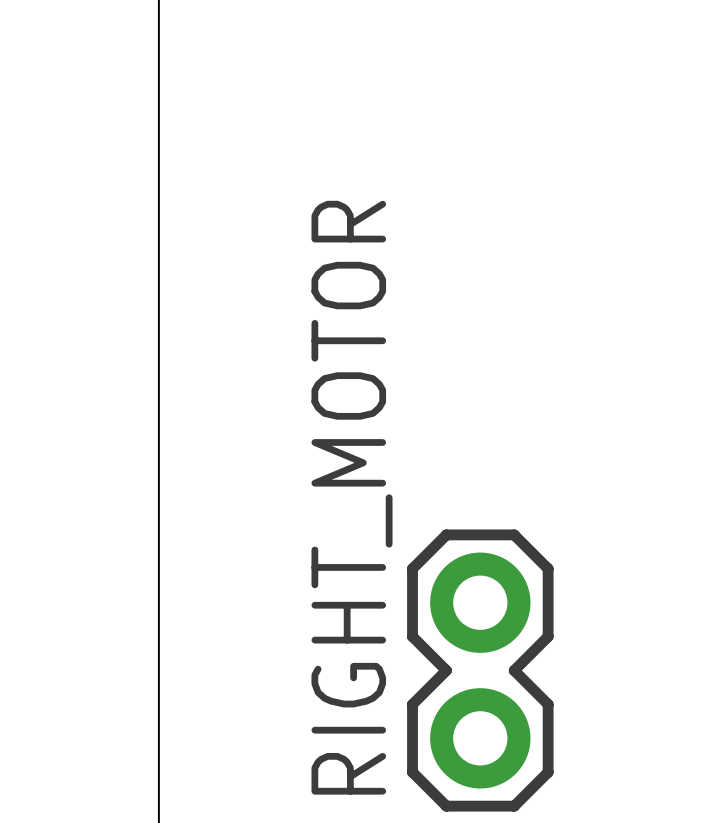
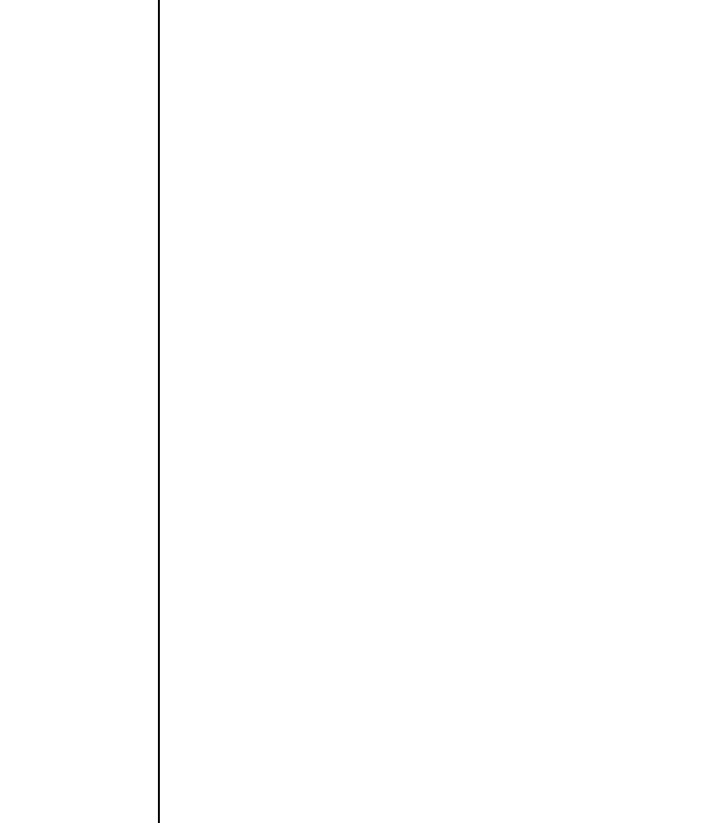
RIGHT_MOTOR: (480, 670) -> none

